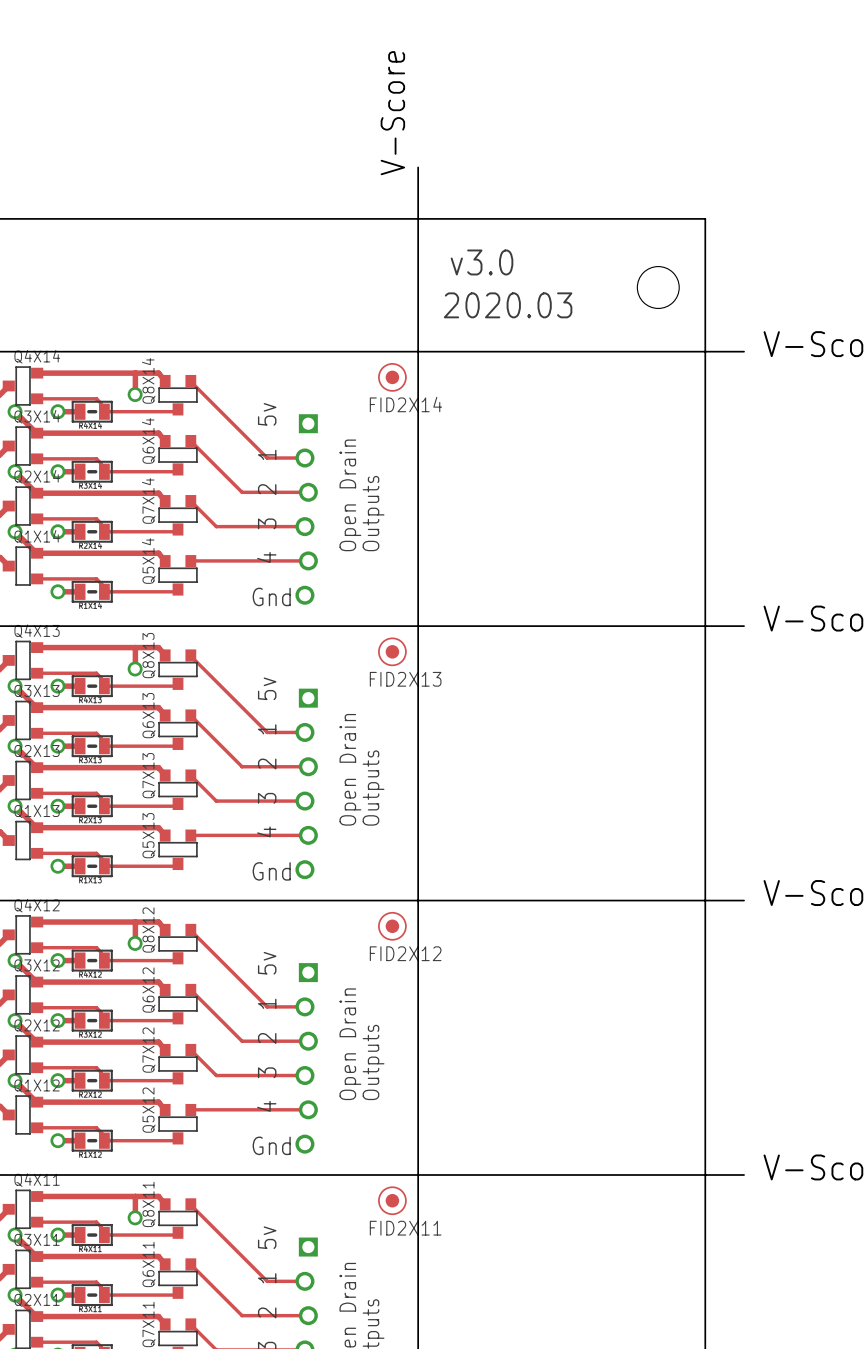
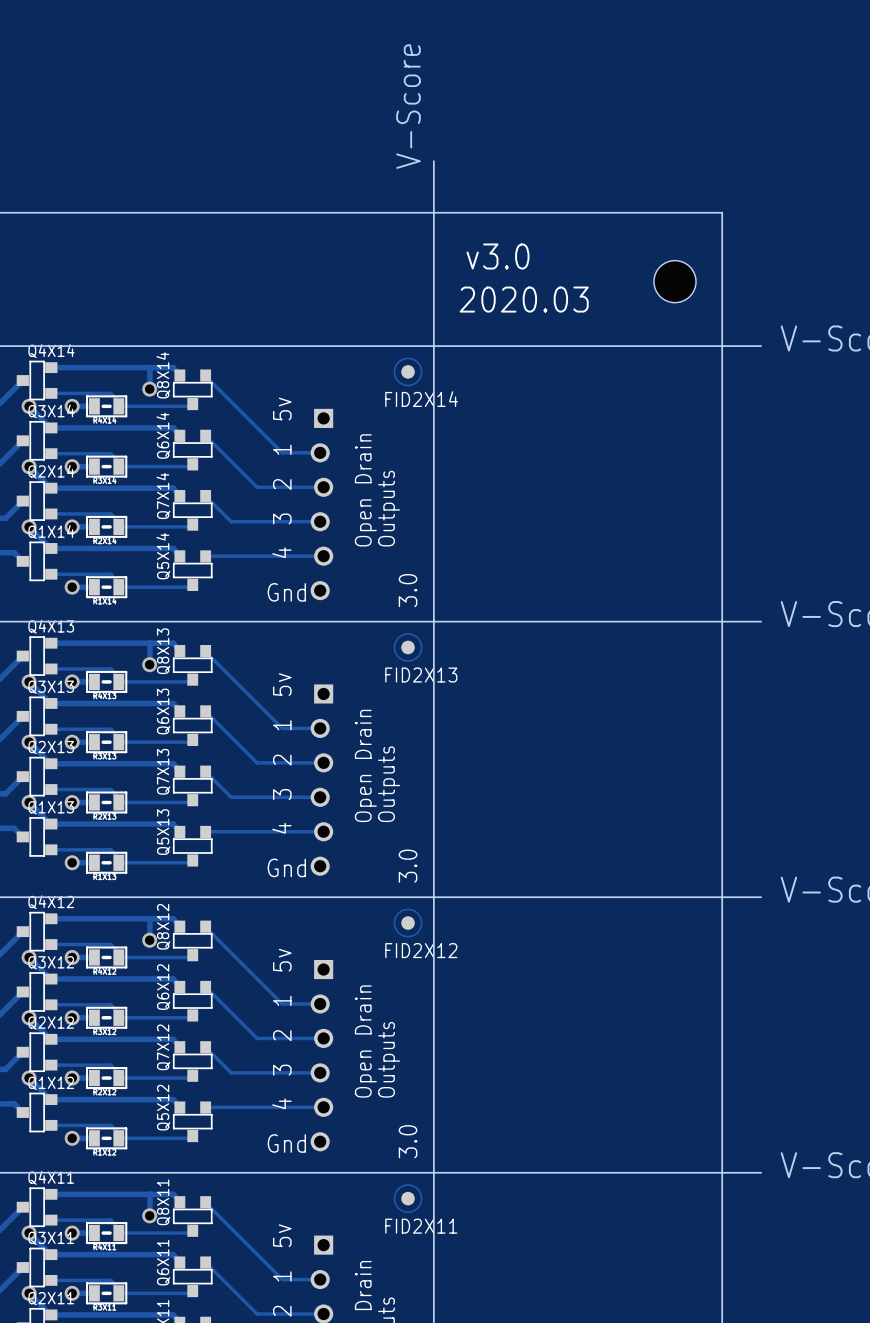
text: none -> 3.0 (408, 590)
text: none -> 3.0 (408, 866)
text: none -> 3.0 (408, 1141)

